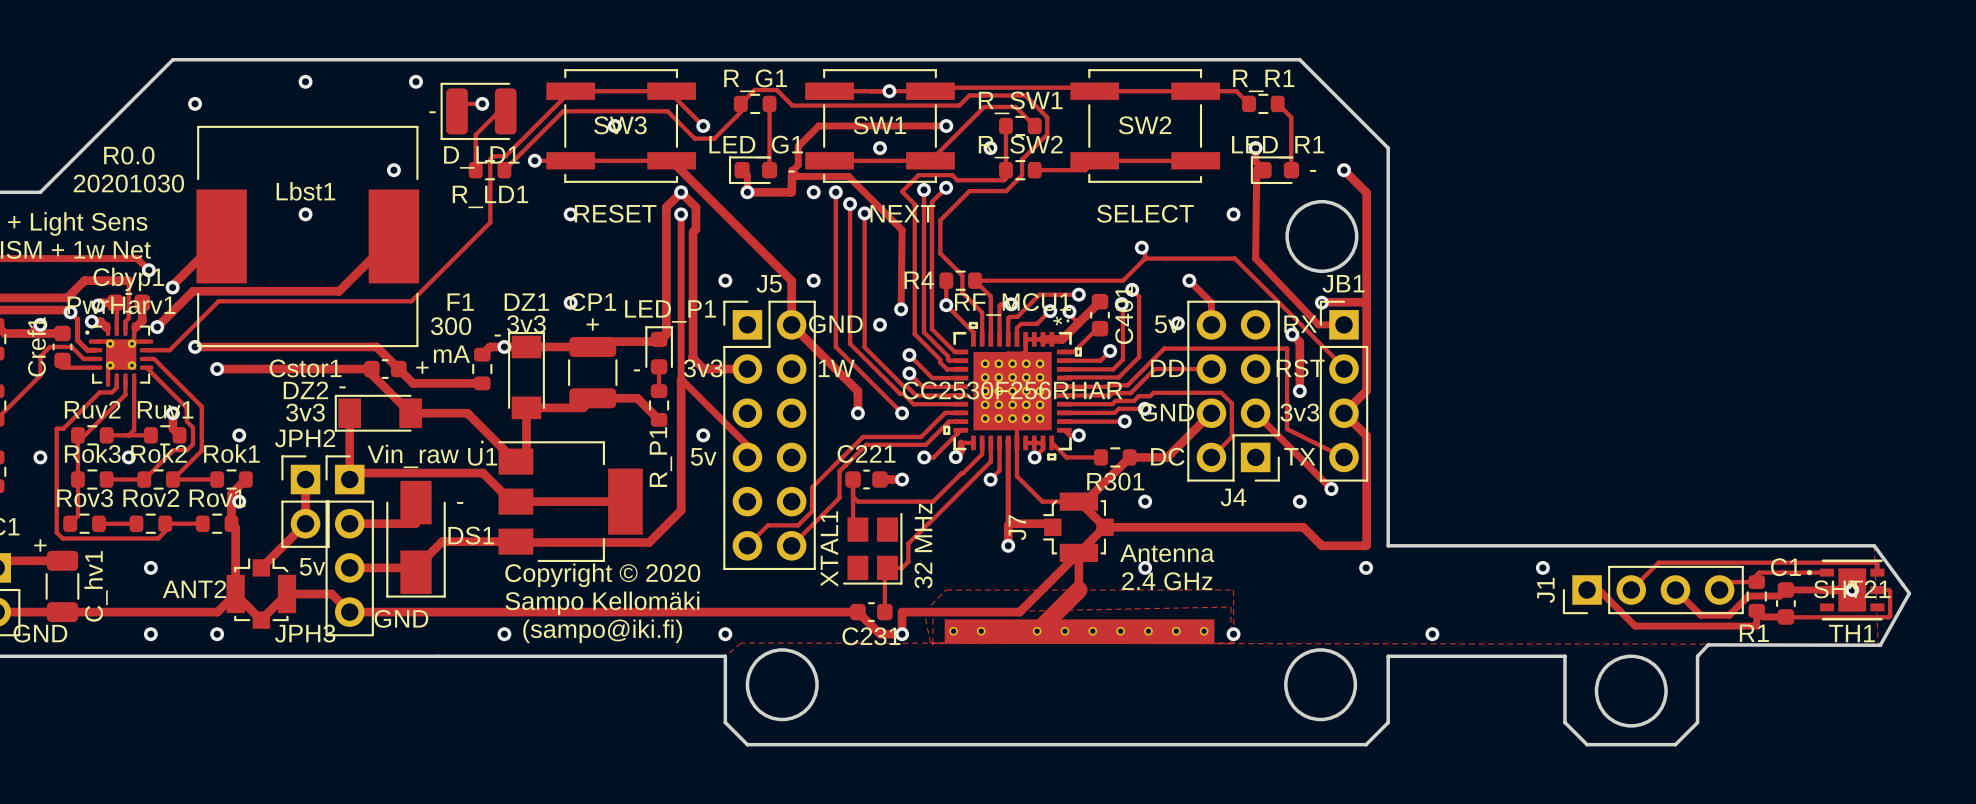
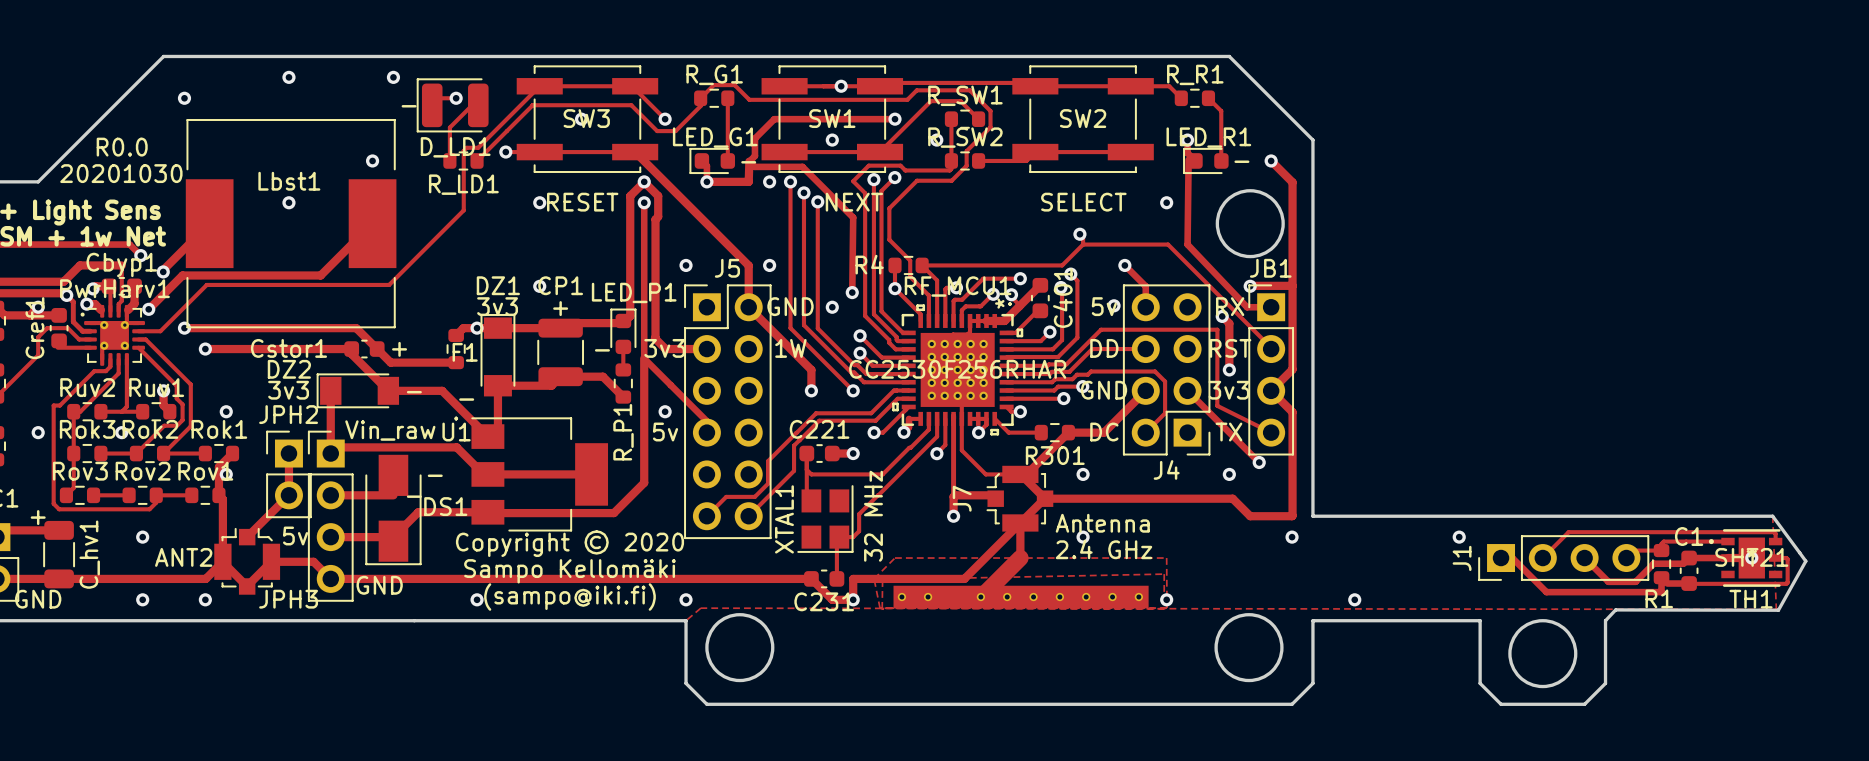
F1 name position: F1 (460, 302) -> F1 (465, 352)
text: 300 (451, 326) -> none
text: - (497, 335) -> none
text: mA (451, 354) -> none
text: - (342, 387) -> none
text: none -> - (414, 392)
text: none -> - (466, 399)
text: none -> - (414, 496)

